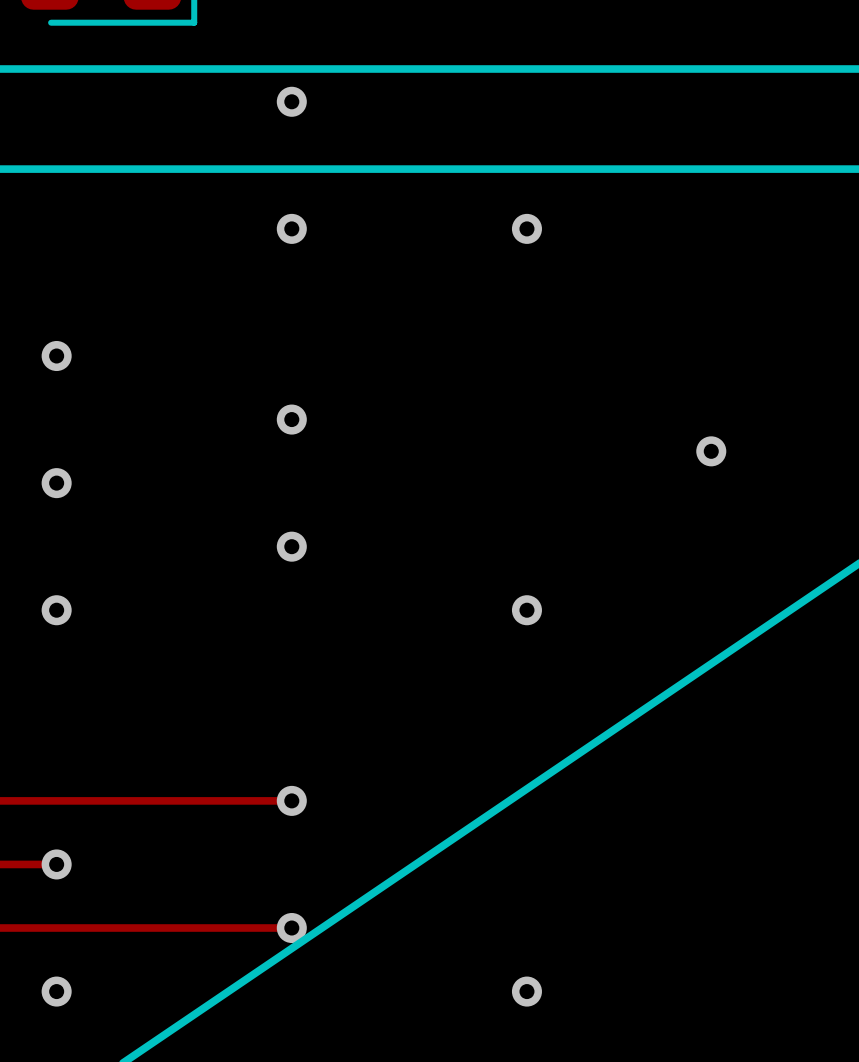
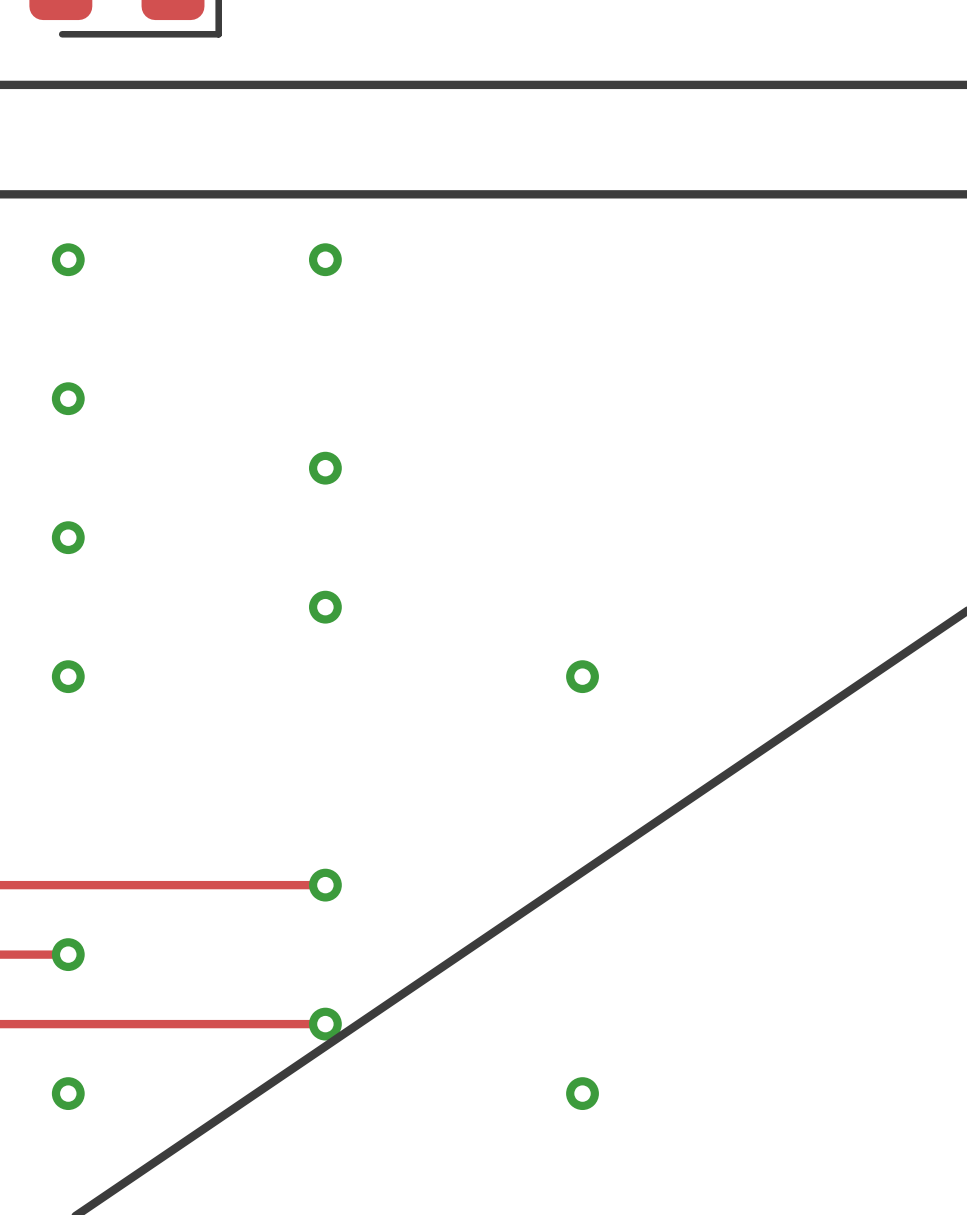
via: (291, 101) -> none
via: none -> (68, 259)
via: (526, 228) -> none
via: (711, 451) -> none

